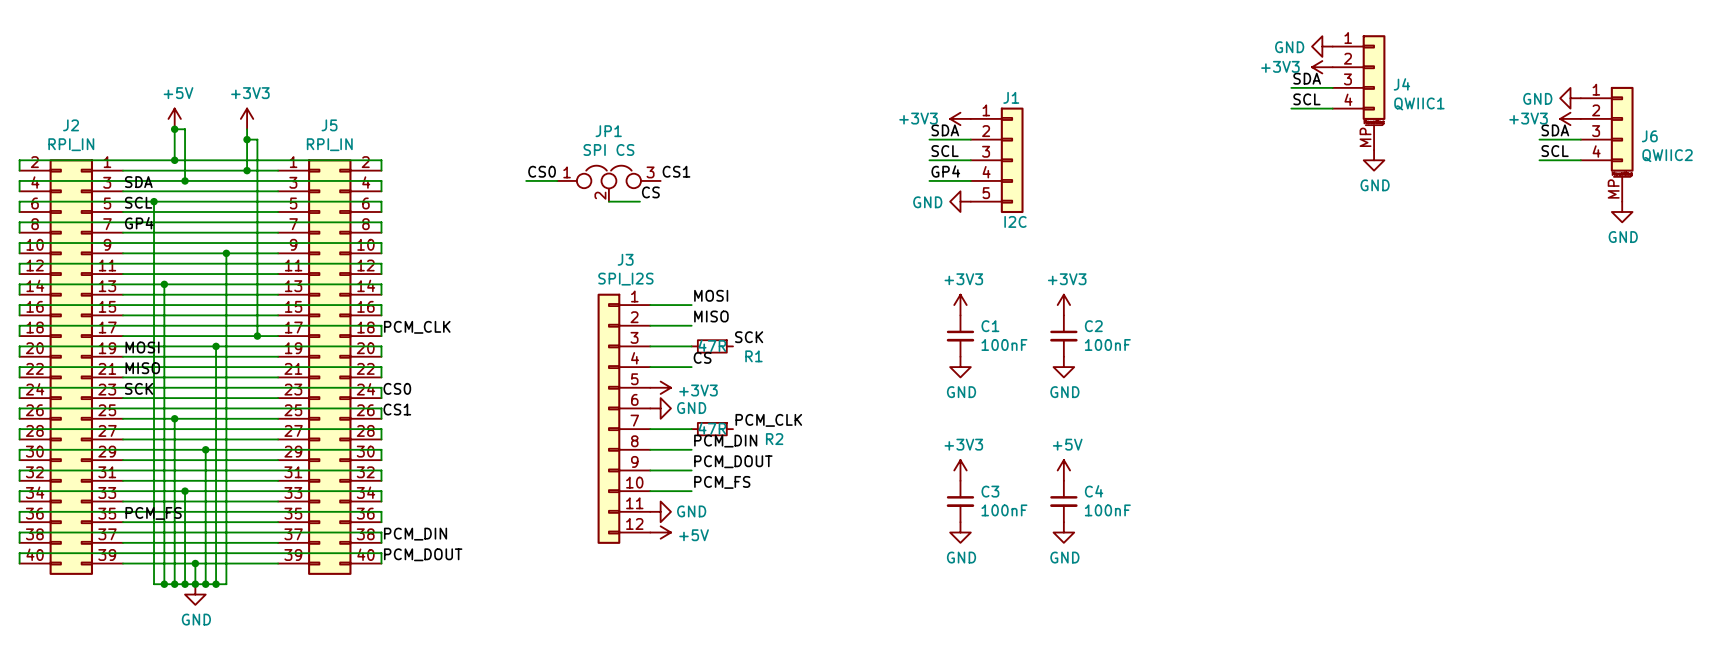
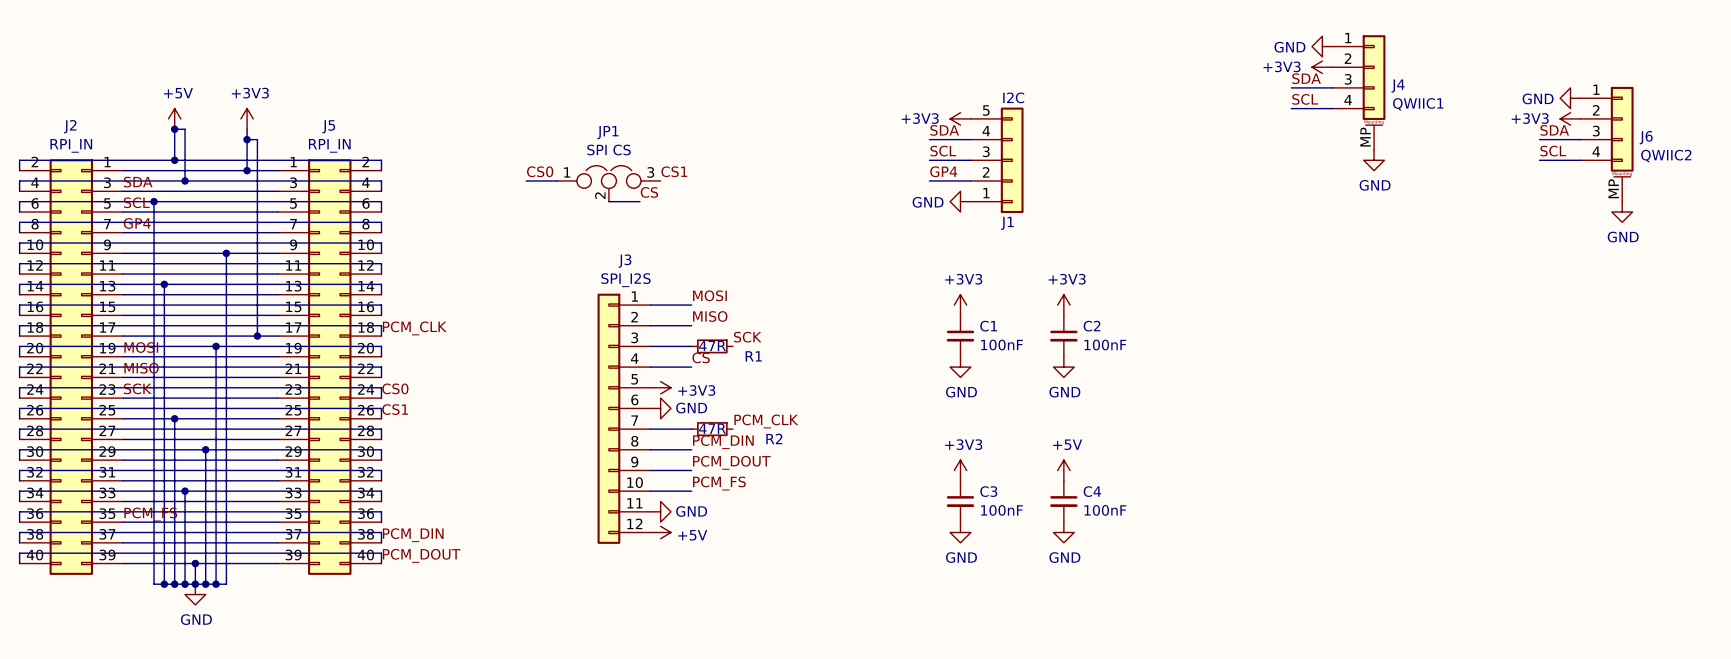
J1 flip: as is (1012, 160) -> up-down (1012, 160)

